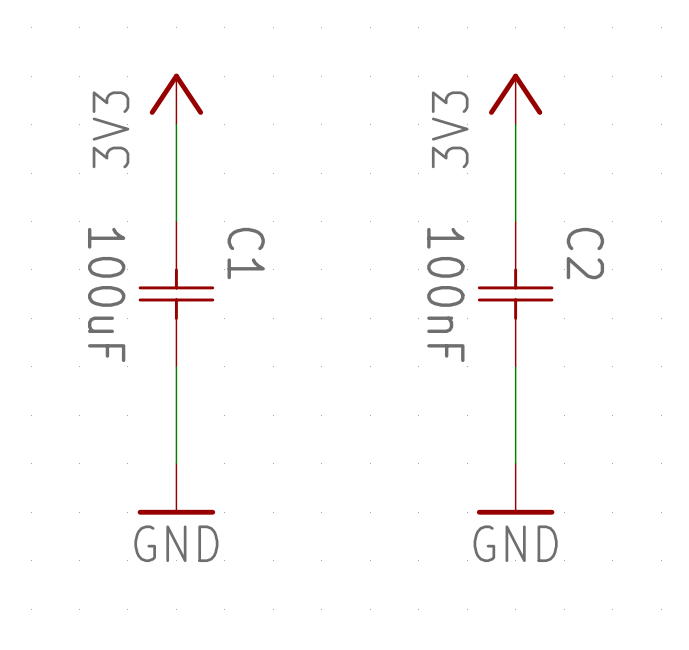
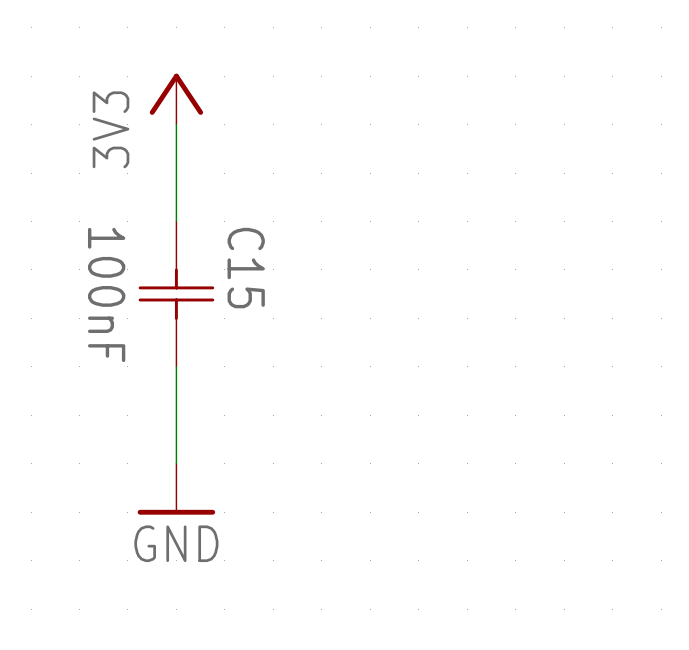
power symbol: 3V3 (515, 99) -> none
wire: (515, 124) (515, 221) -> none
C1 name: C1 (246, 253) -> C15 (246, 268)
C1 value: 100uF (106, 294) -> 100nF (106, 294)
C2: 100nF (515, 294) -> none
wire: (515, 366) (515, 463) -> none
power symbol: GND (515, 489) -> none

